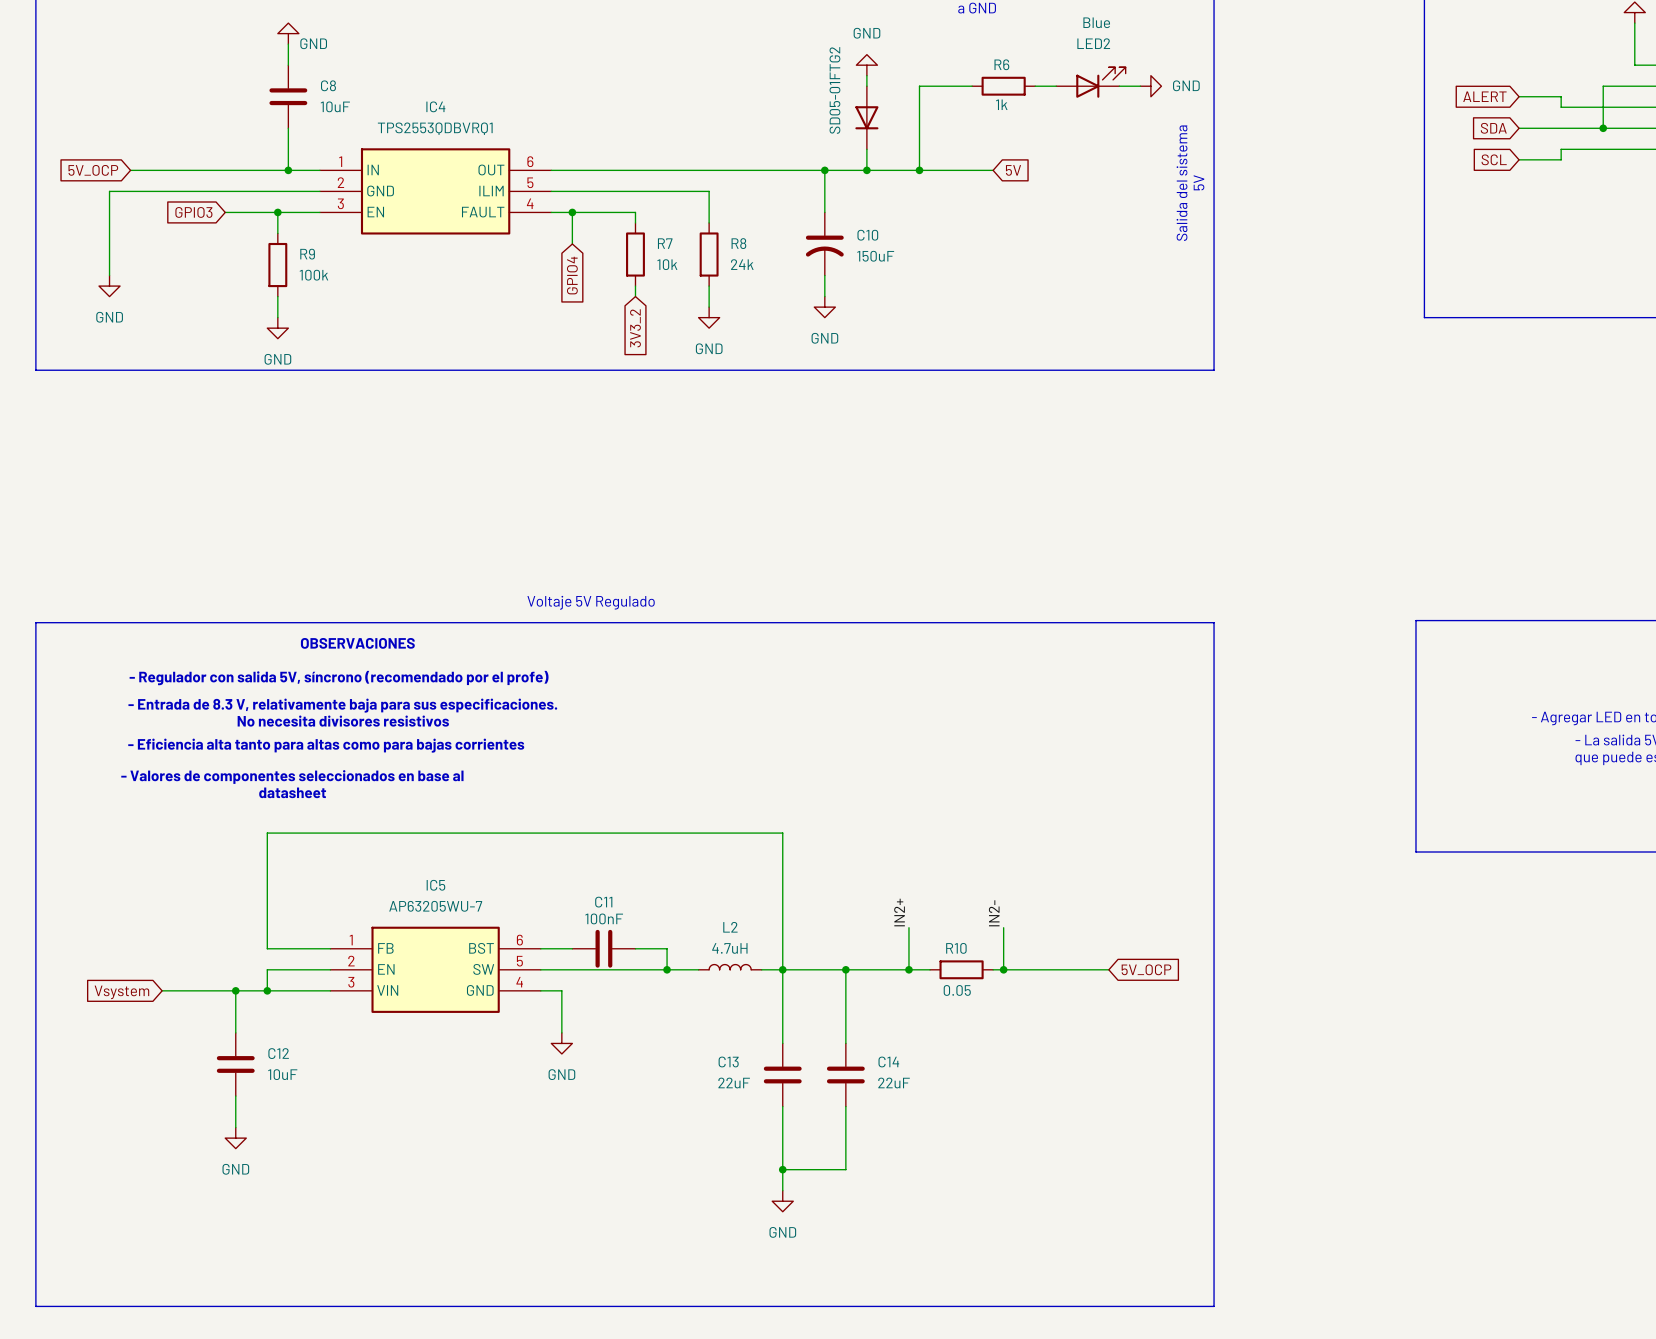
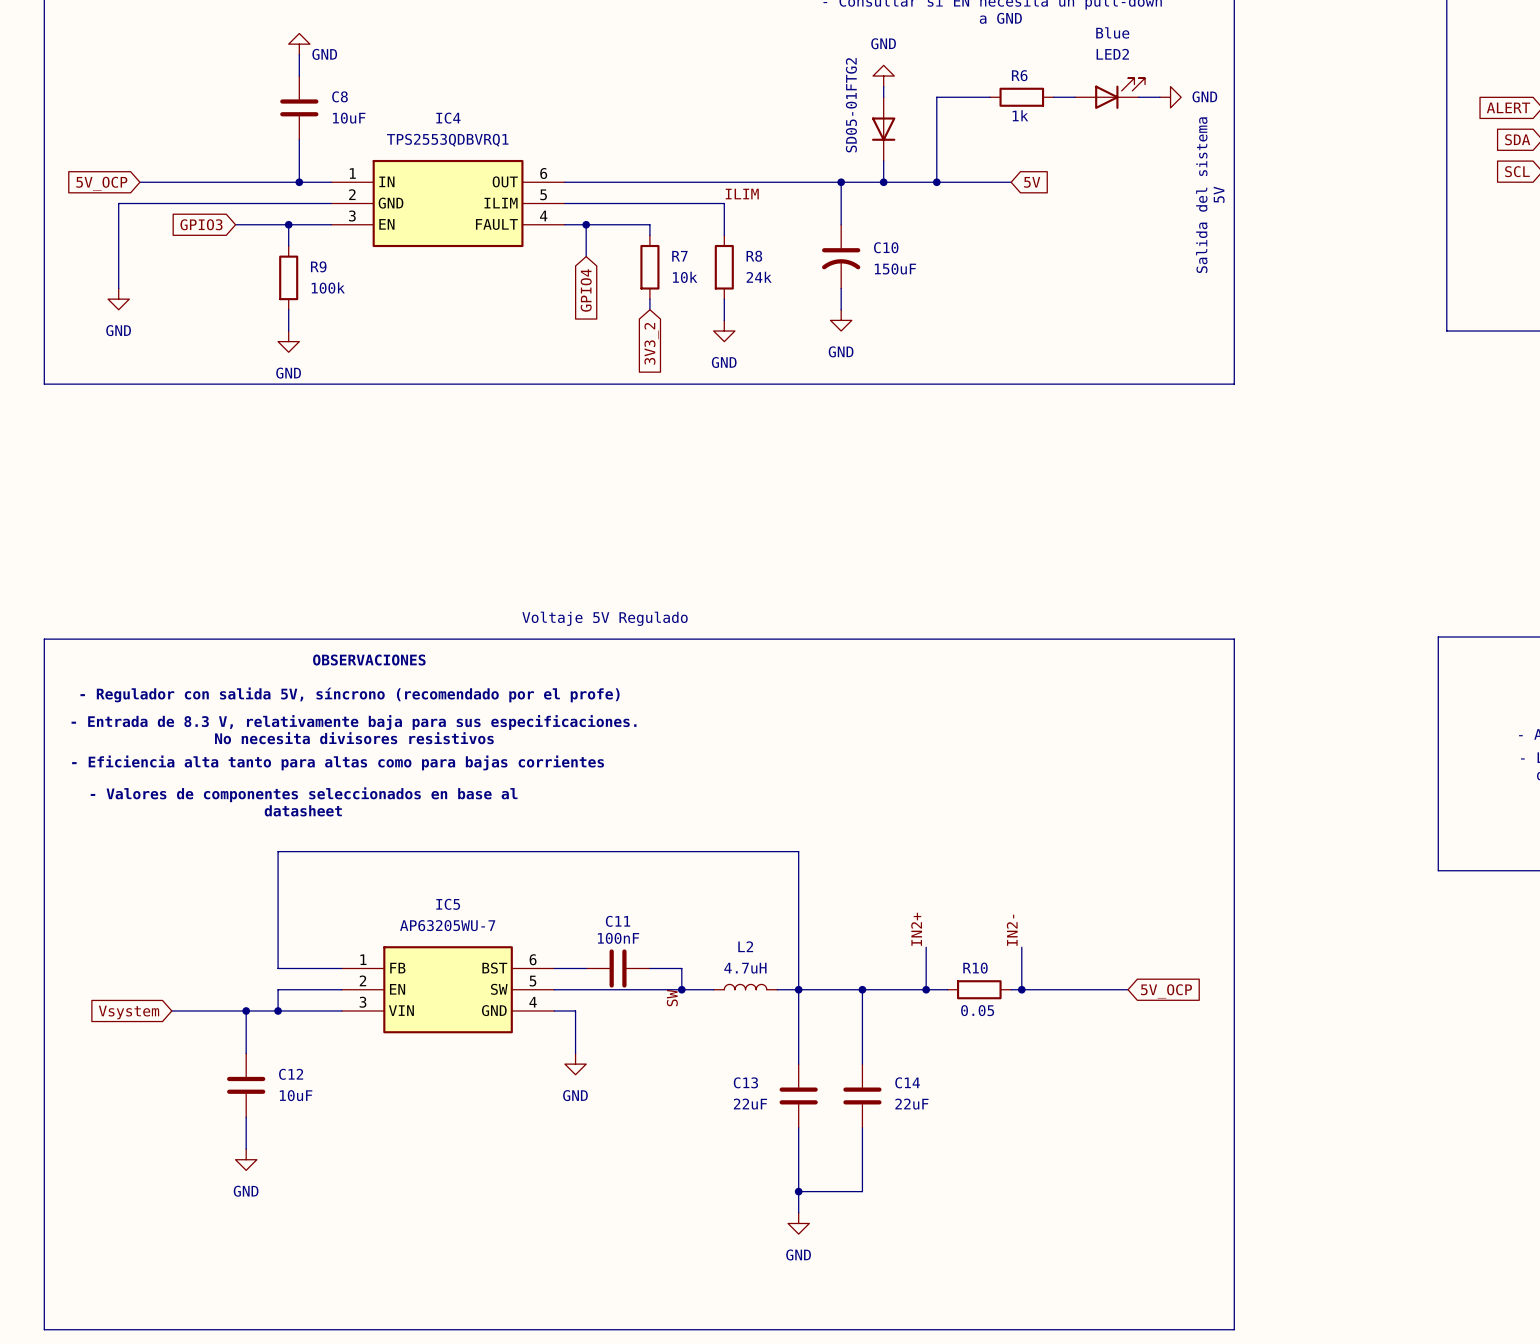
label: none -> ILIM (742, 194)
label: none -> SW (672, 998)

